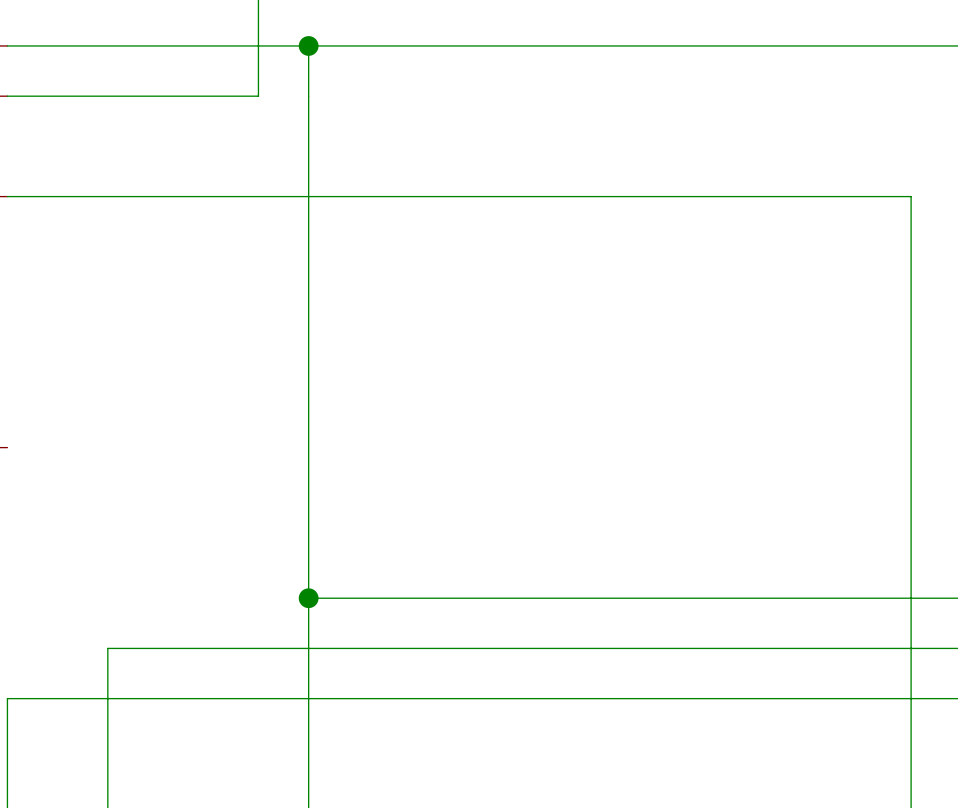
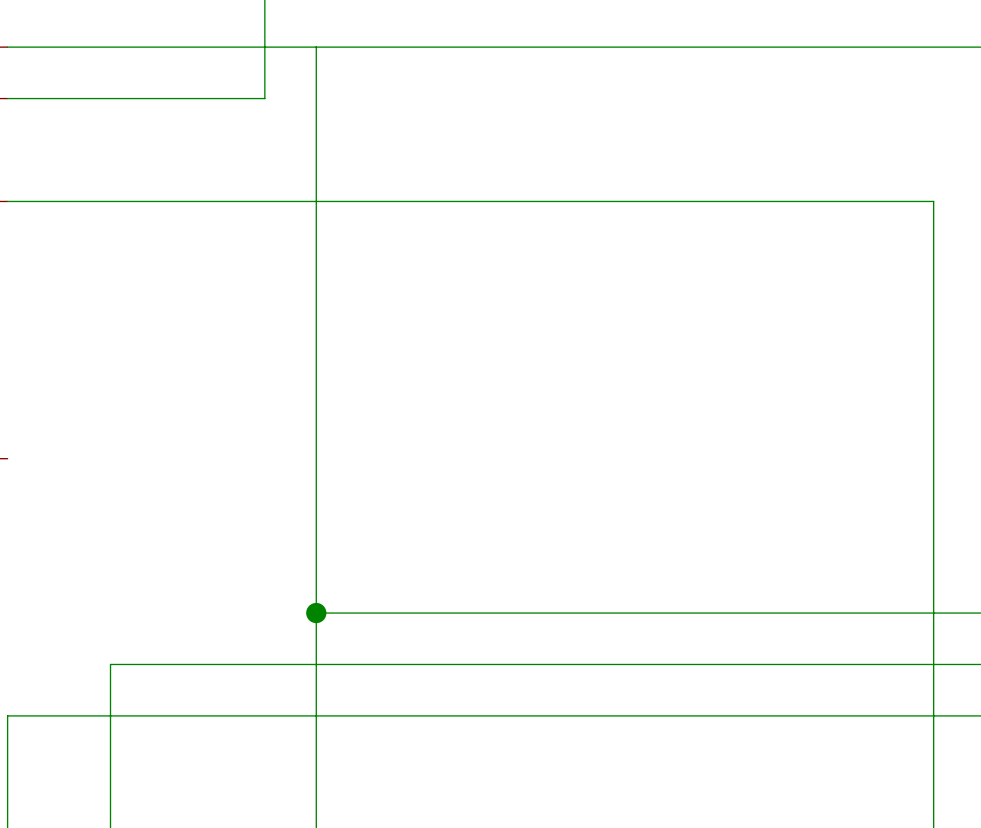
junction: (308, 45) -> none

